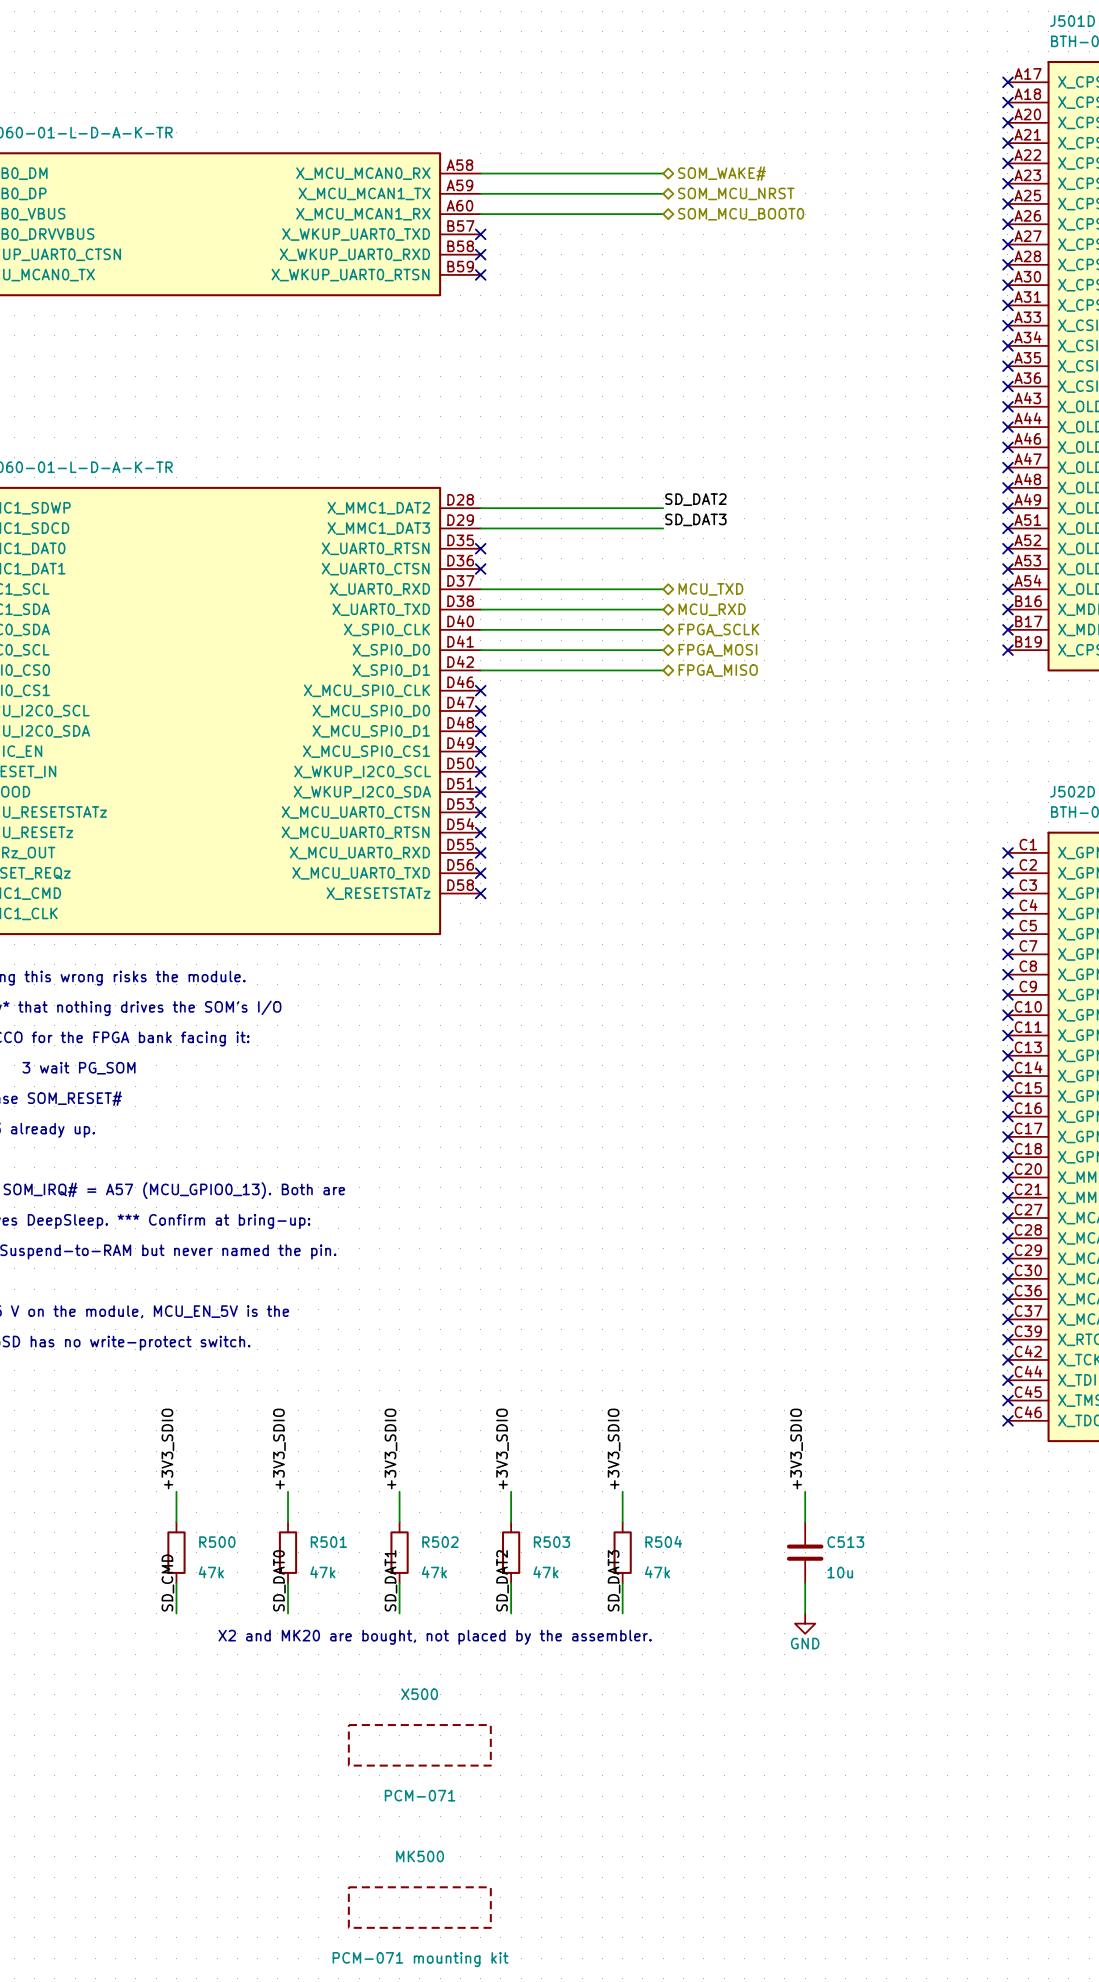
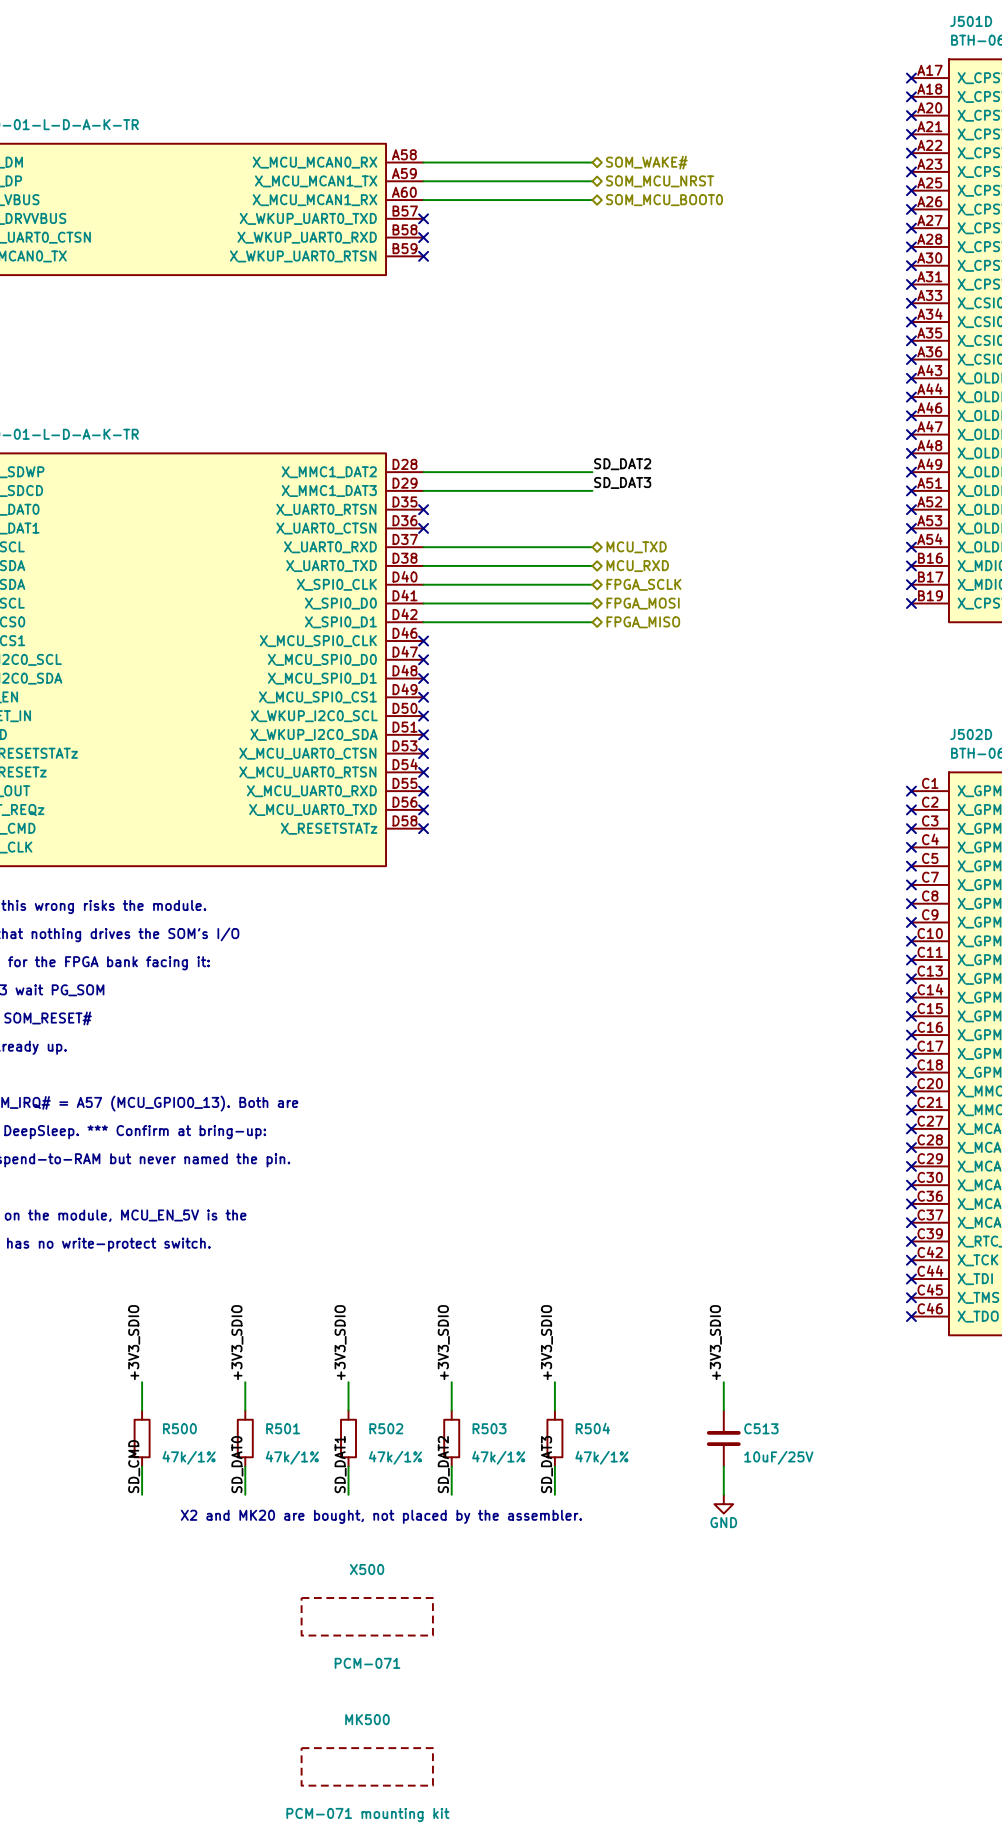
R500 value: 47k (211, 1572) -> 47k/1% (189, 1457)
R501 value: 47k (322, 1572) -> 47k/1% (292, 1457)
R502 value: 47k (434, 1572) -> 47k/1% (395, 1457)
R503 value: 47k (545, 1572) -> 47k/1% (498, 1457)
R504 value: 47k (657, 1572) -> 47k/1% (601, 1457)
C513 value: 10u (840, 1572) -> 10uF/25V (778, 1457)

